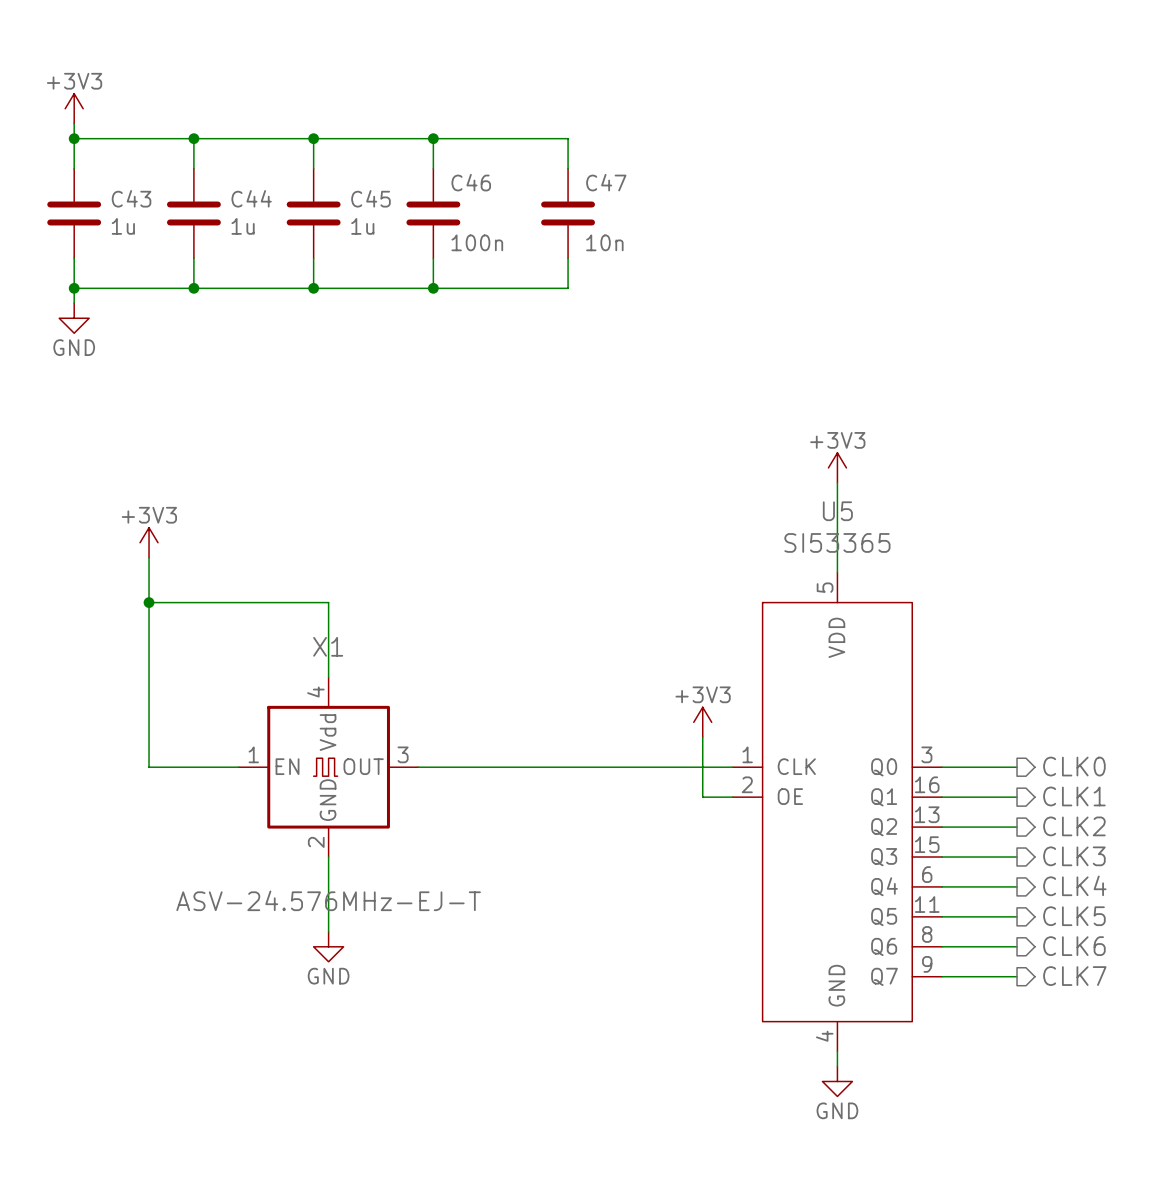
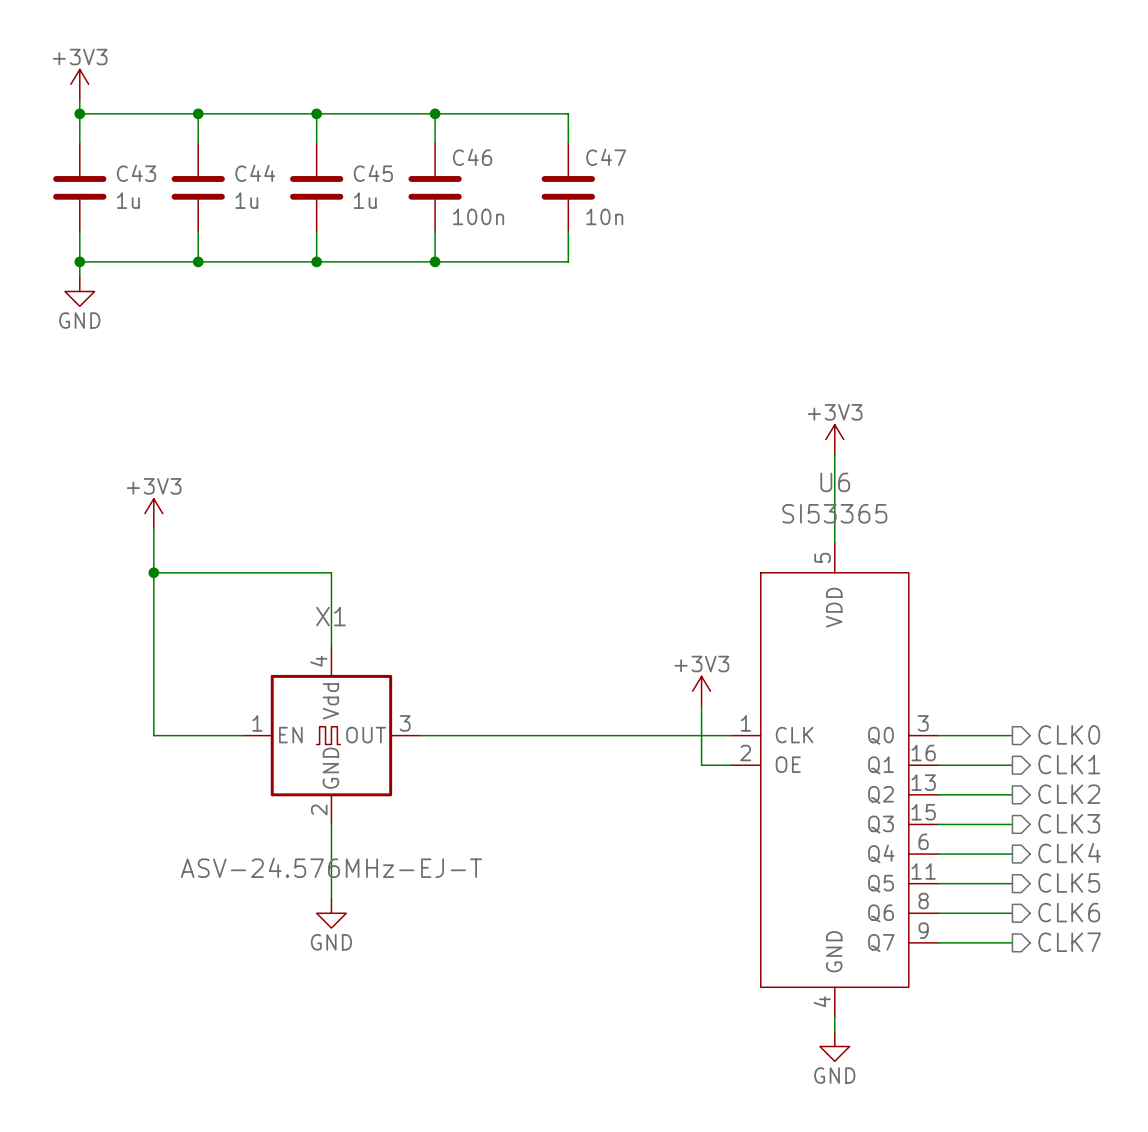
U5 name: U5 (837, 511) -> U6 (835, 482)

